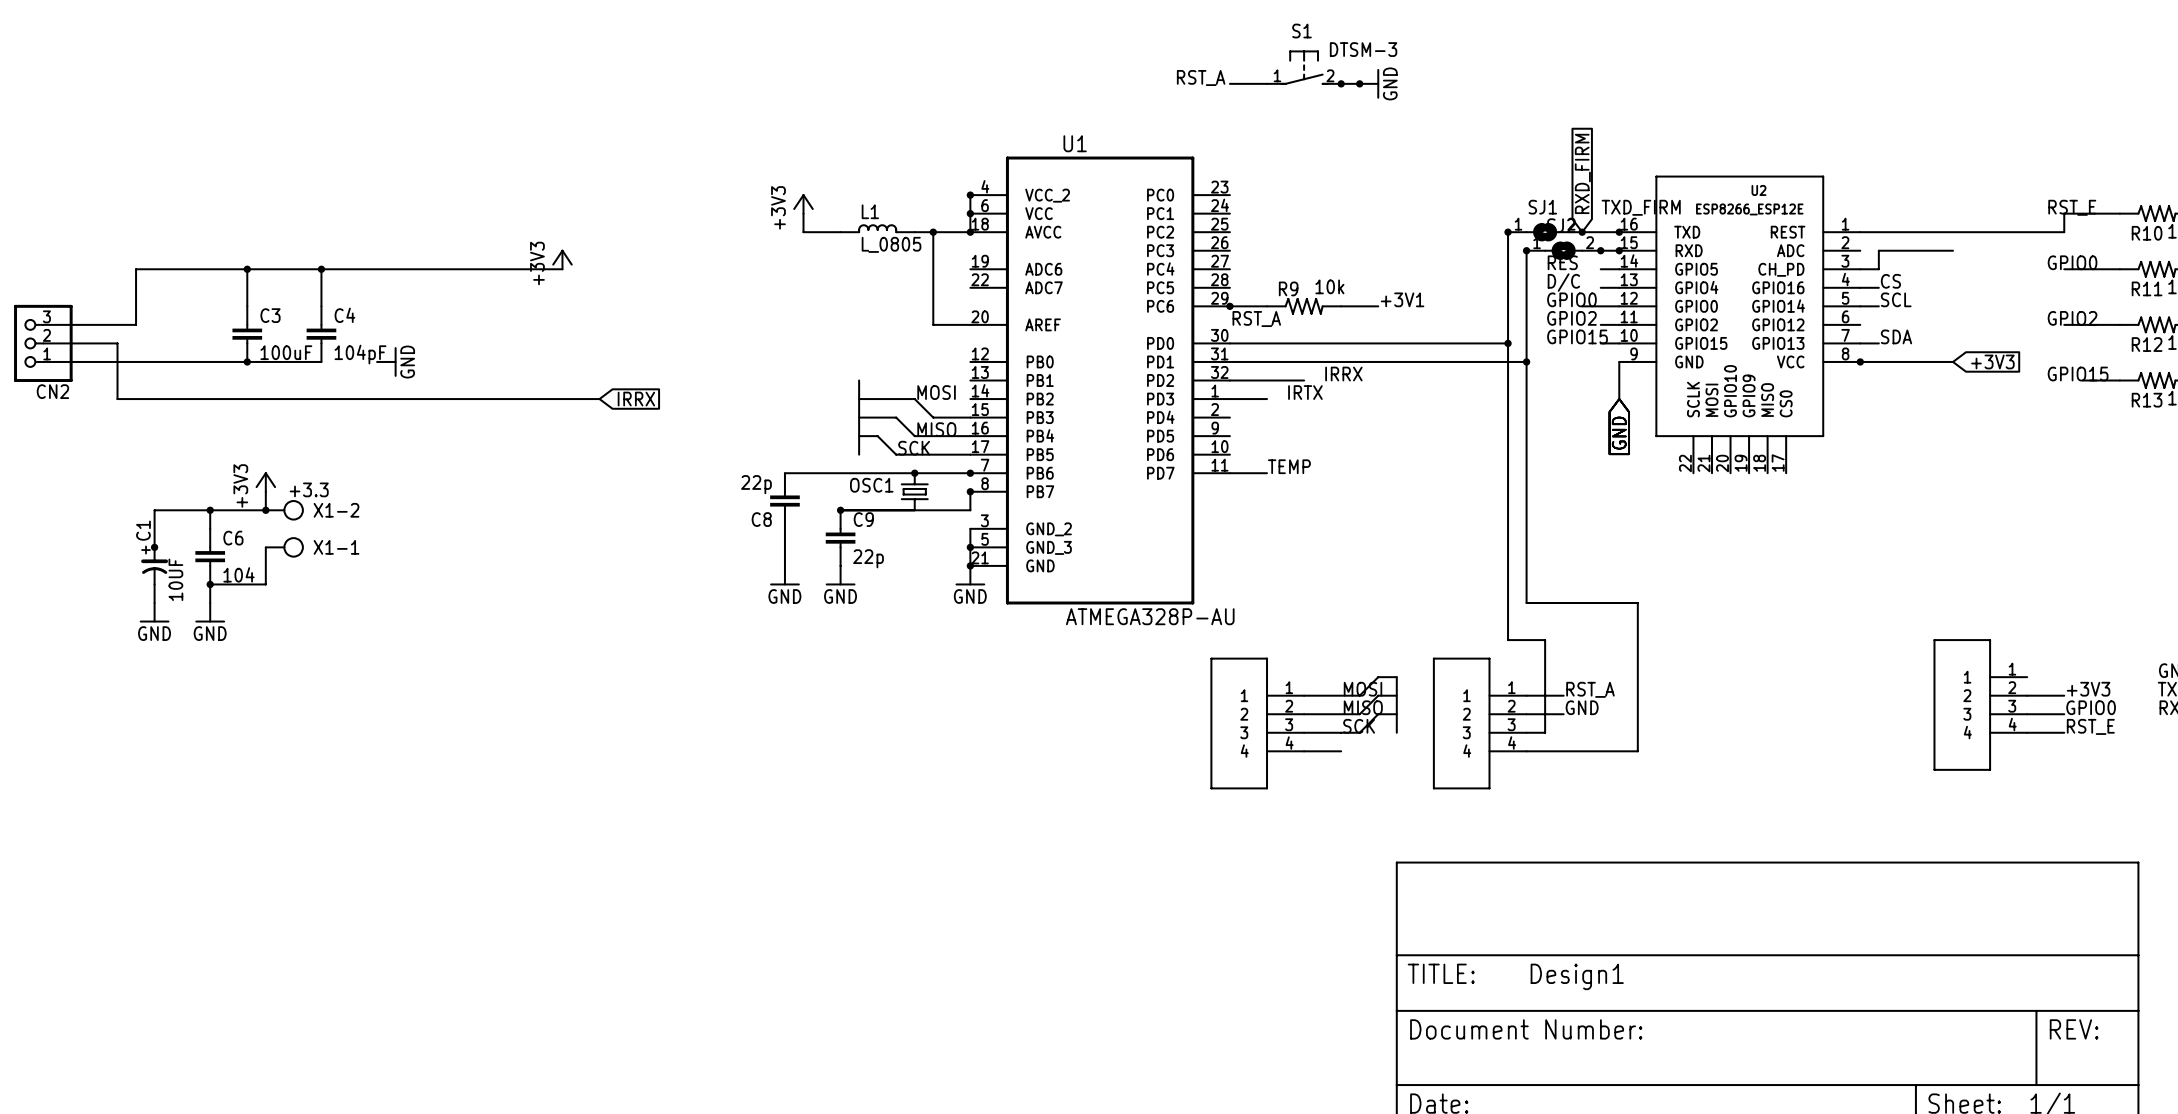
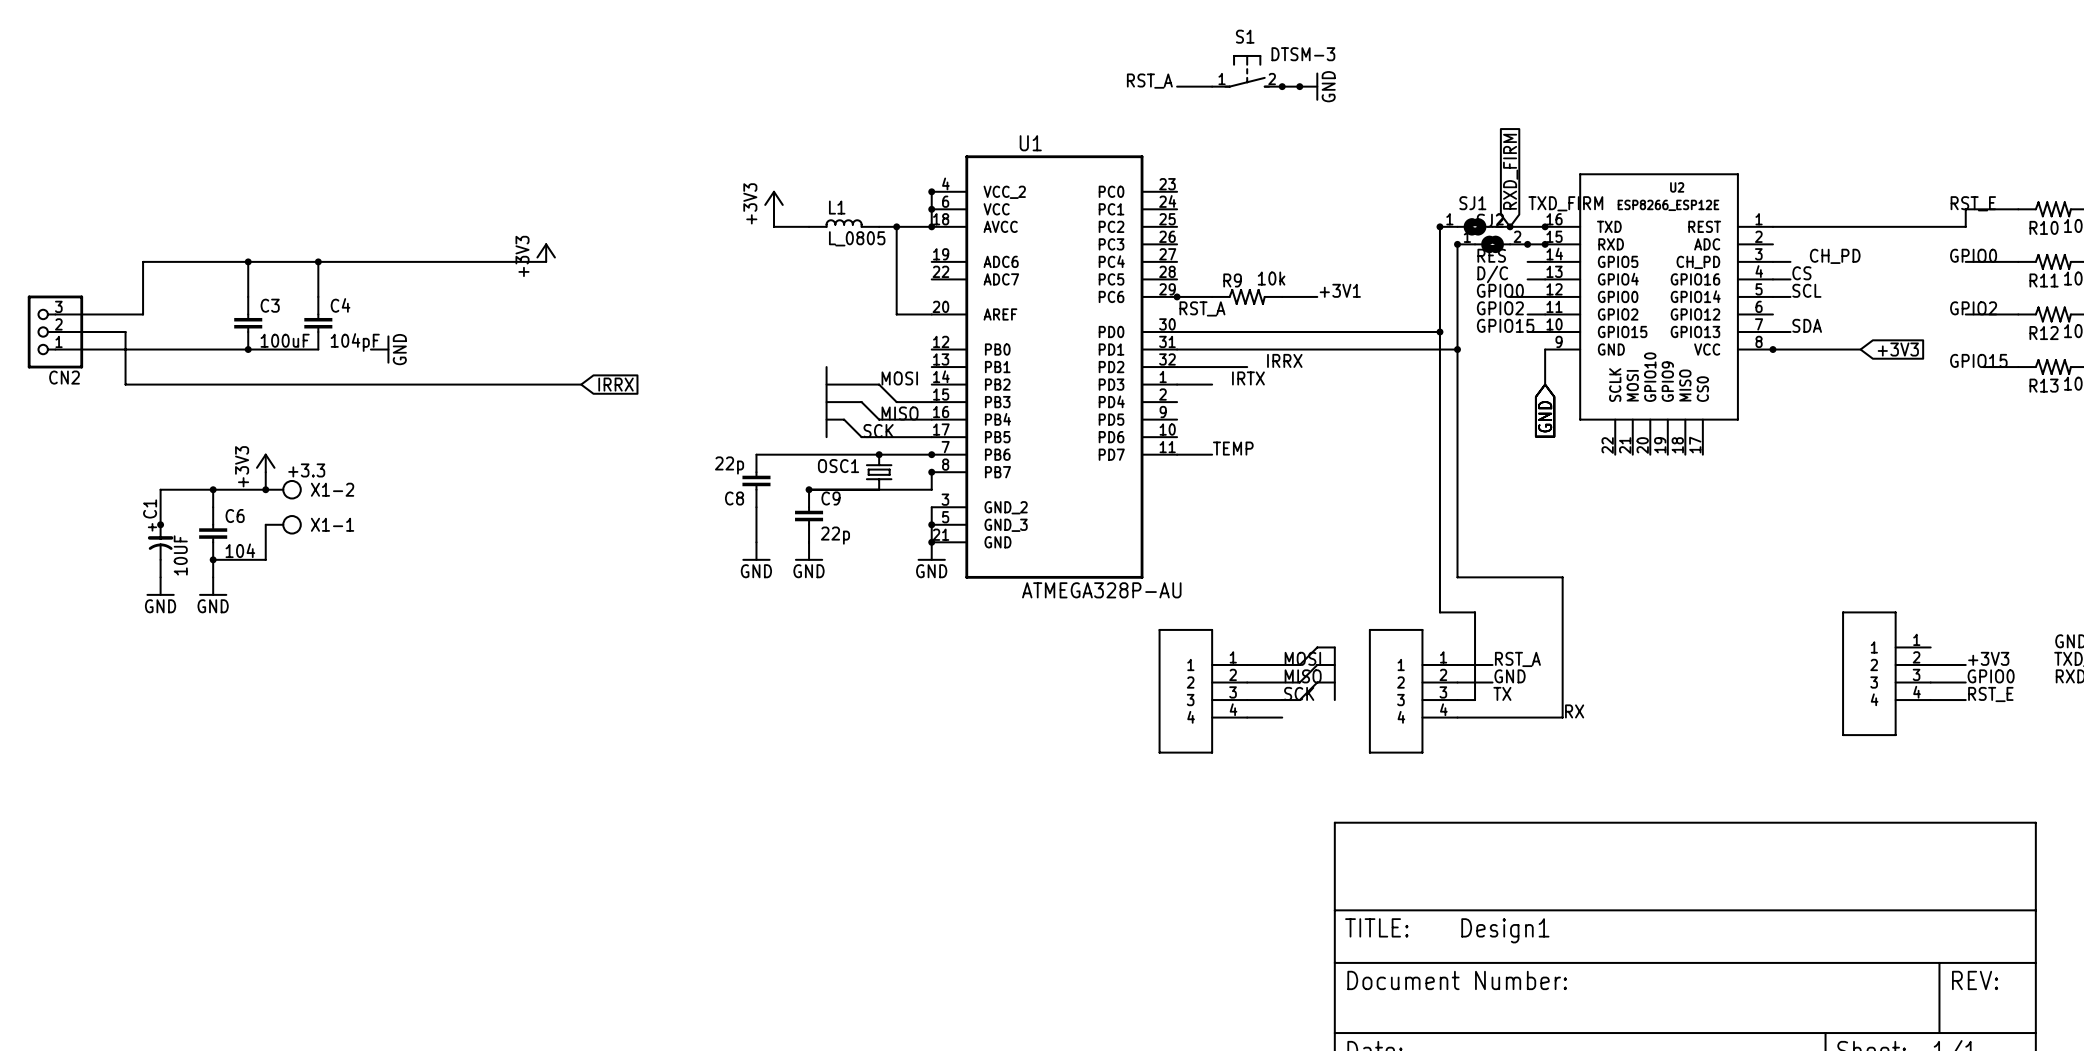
wire: (1953, 250) (1878, 250) (1878, 269) -> none
label: none -> CH_PD (1835, 256)
label: none -> TX (1502, 693)
label: none -> RX (1574, 711)

